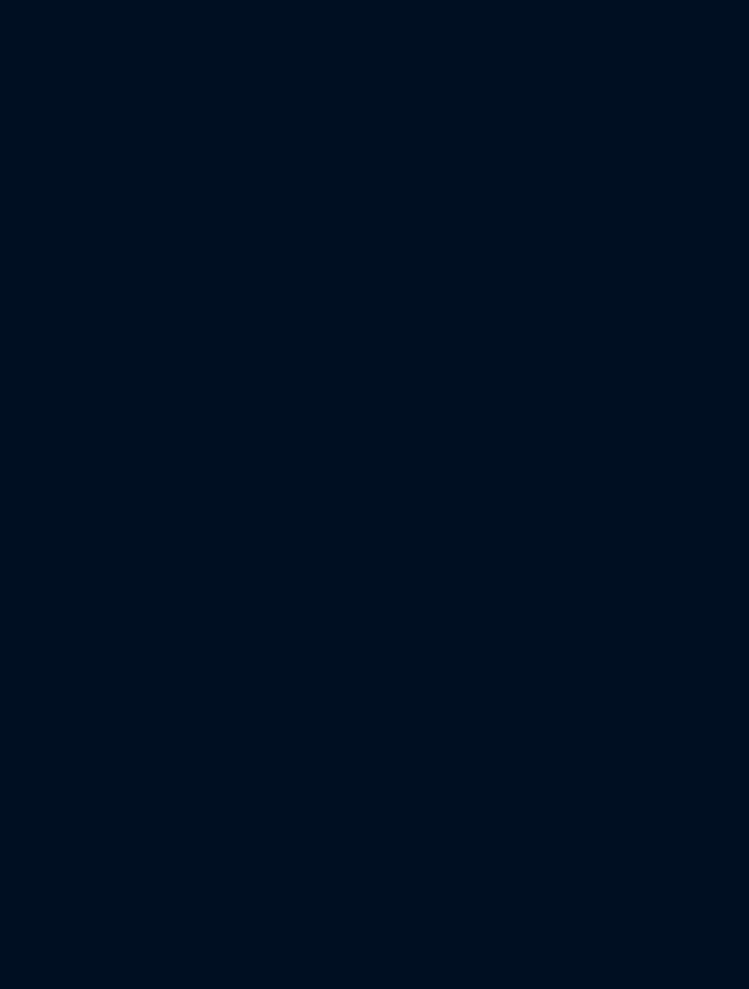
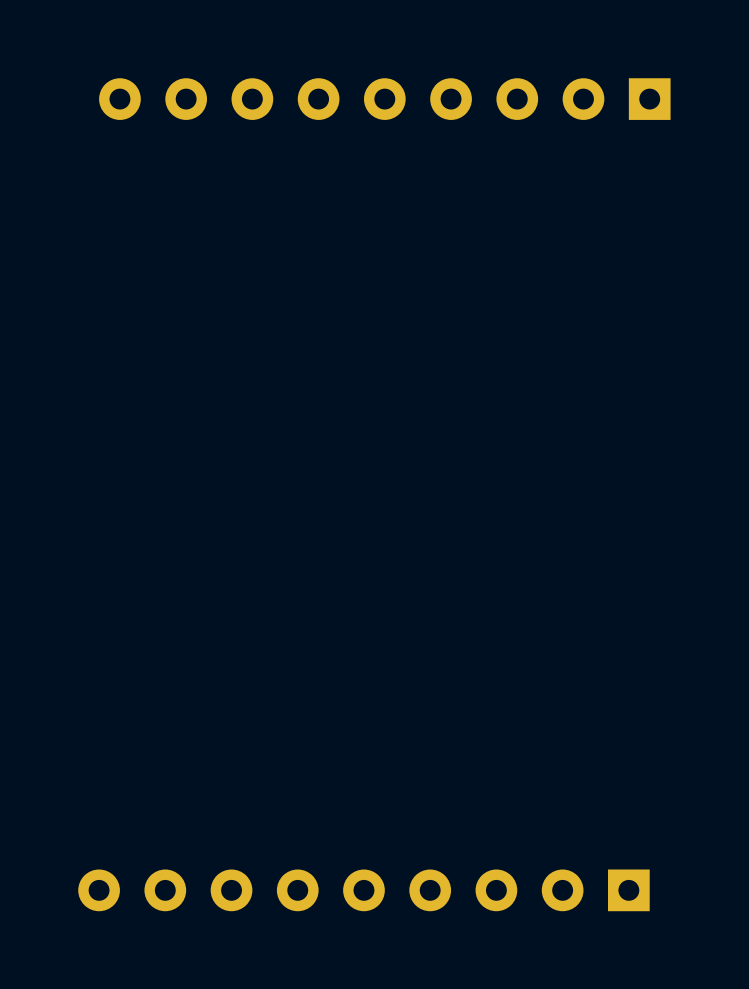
part: none -> (384, 99)
part: none -> (363, 890)

